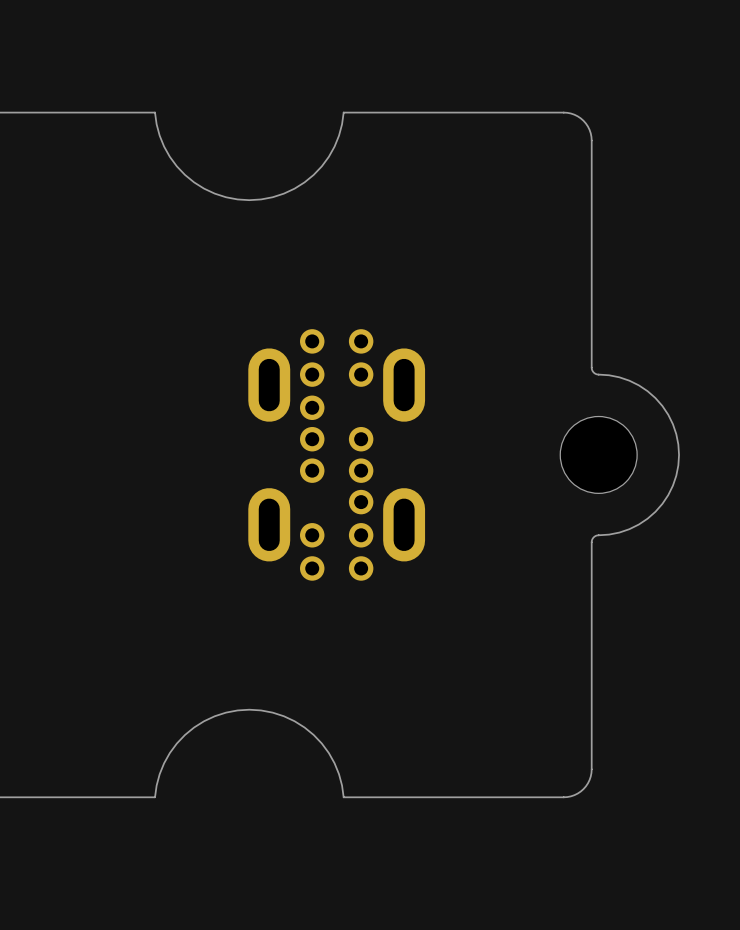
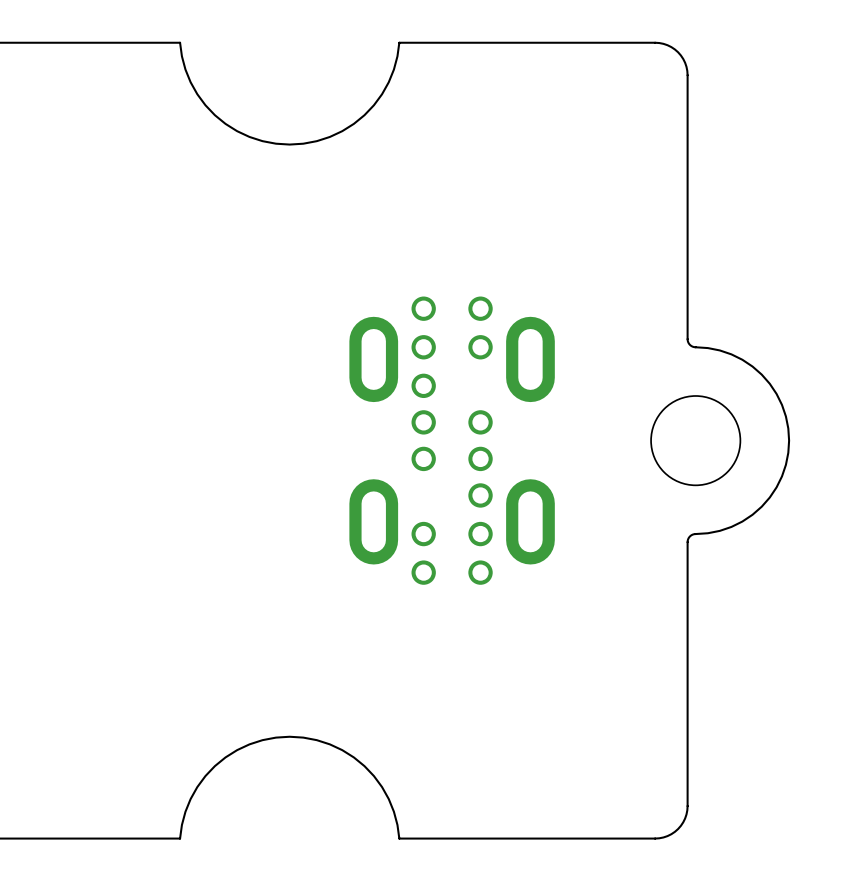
part: (336, 454) -> none
part: none -> (452, 440)

